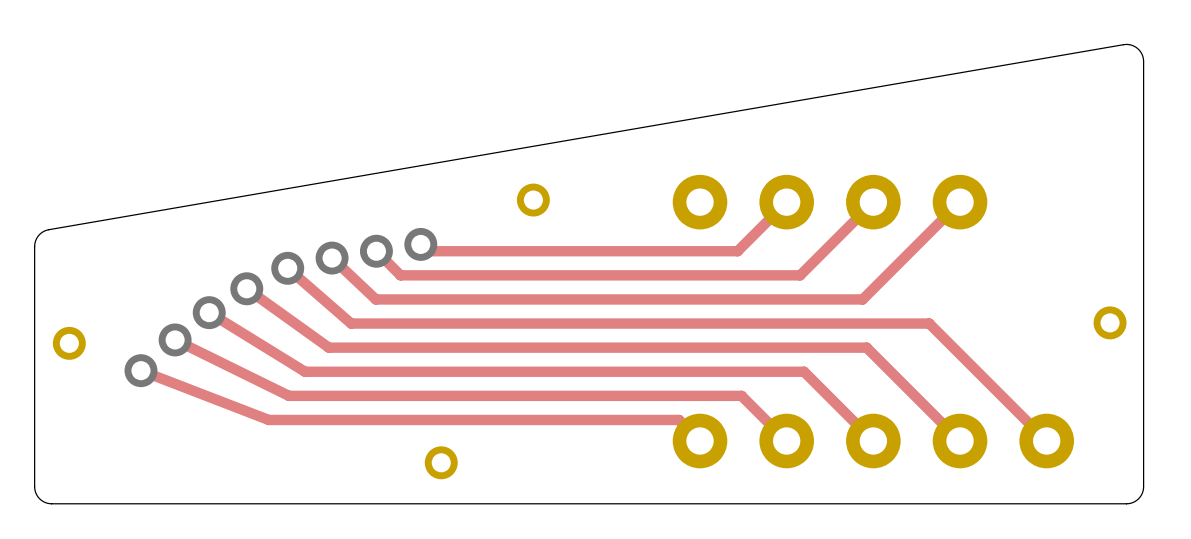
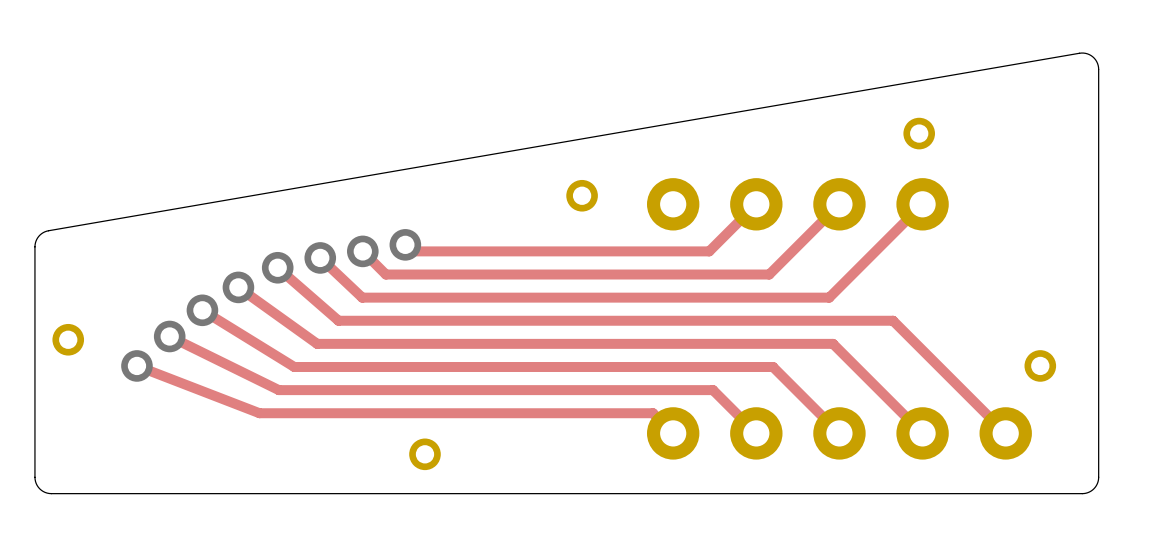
part: none -> (919, 133)
part position: (533, 200) -> (582, 195)
part position: (1110, 322) -> (1040, 365)

